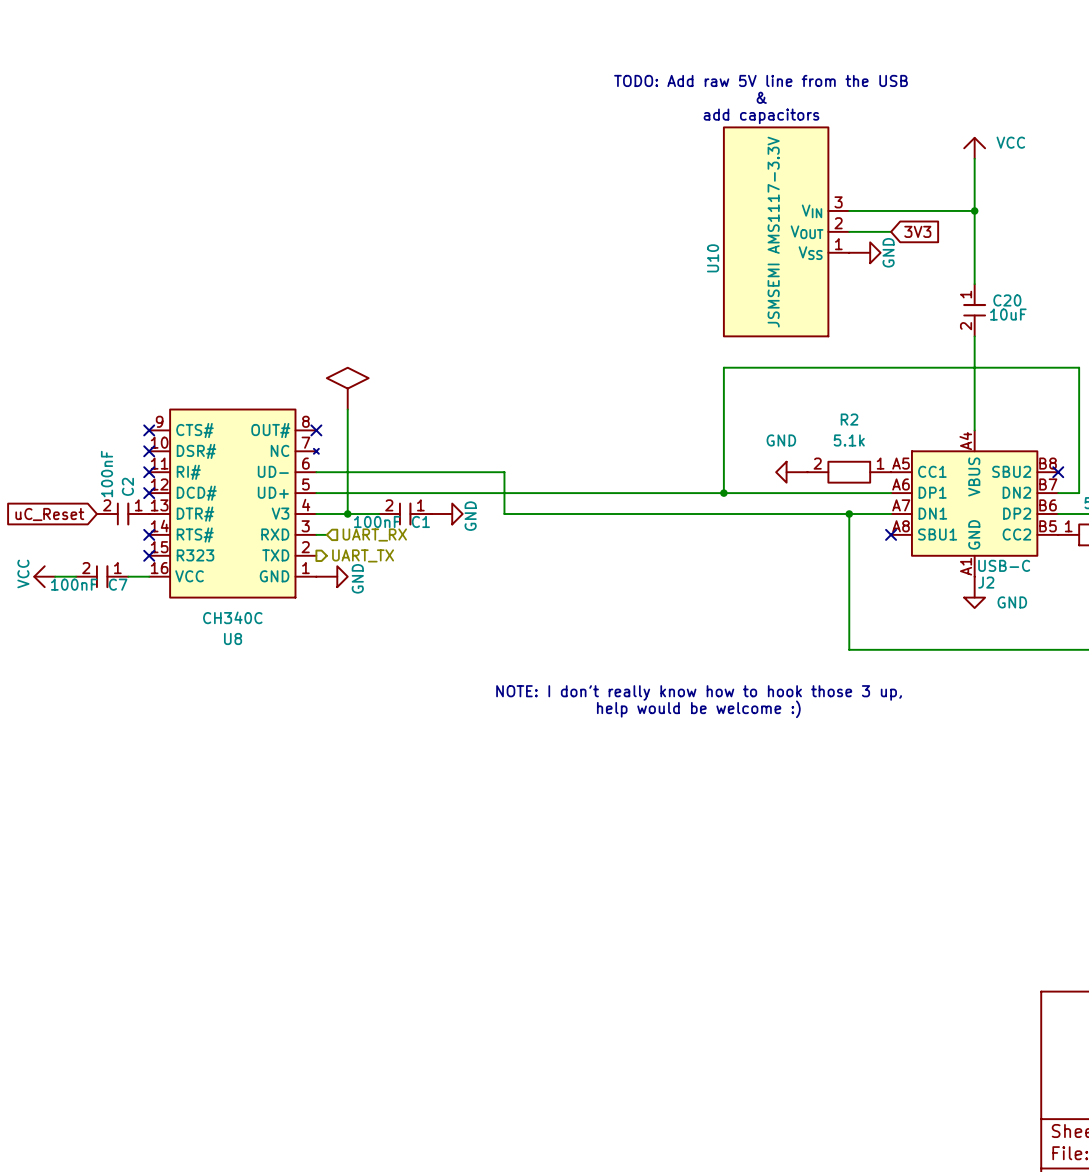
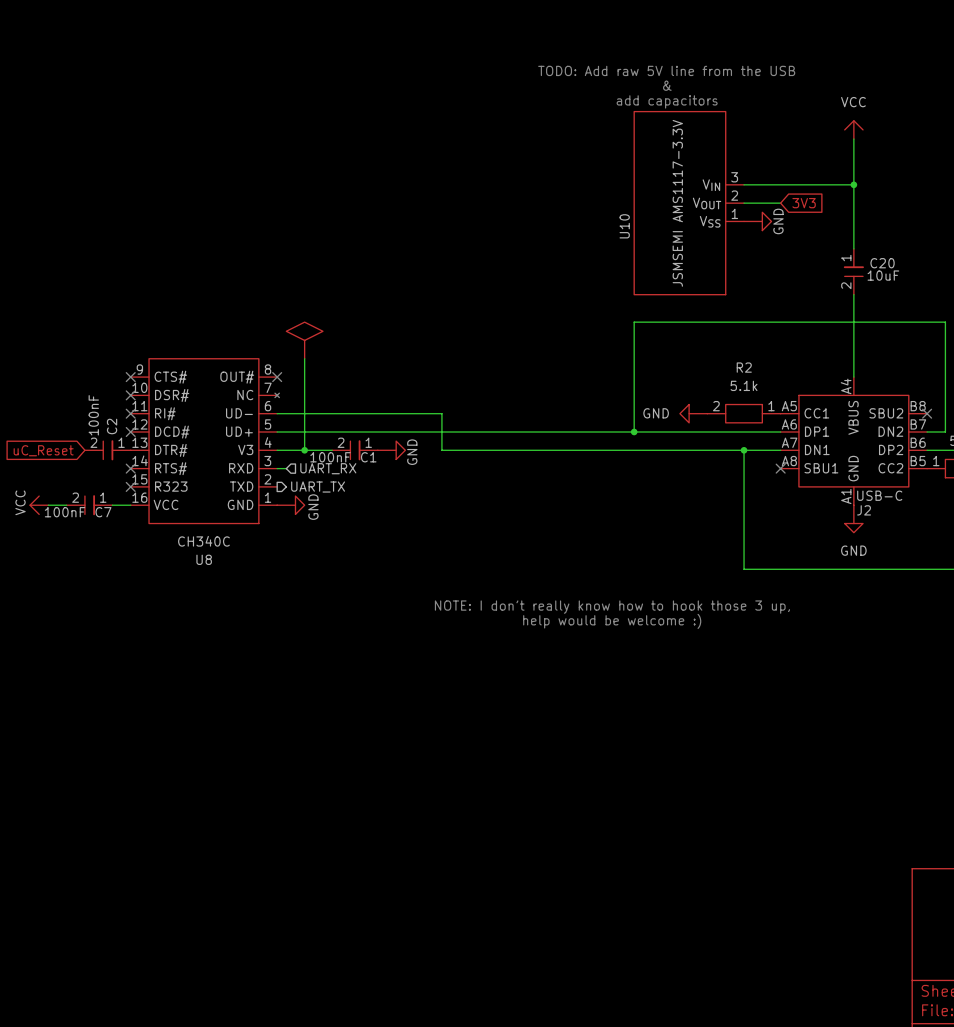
power symbol text position: VCC (1010, 142) -> VCC (853, 102)
power symbol text position: GND (781, 440) -> GND (656, 413)
power symbol text position: GND (1012, 602) -> GND (853, 550)

